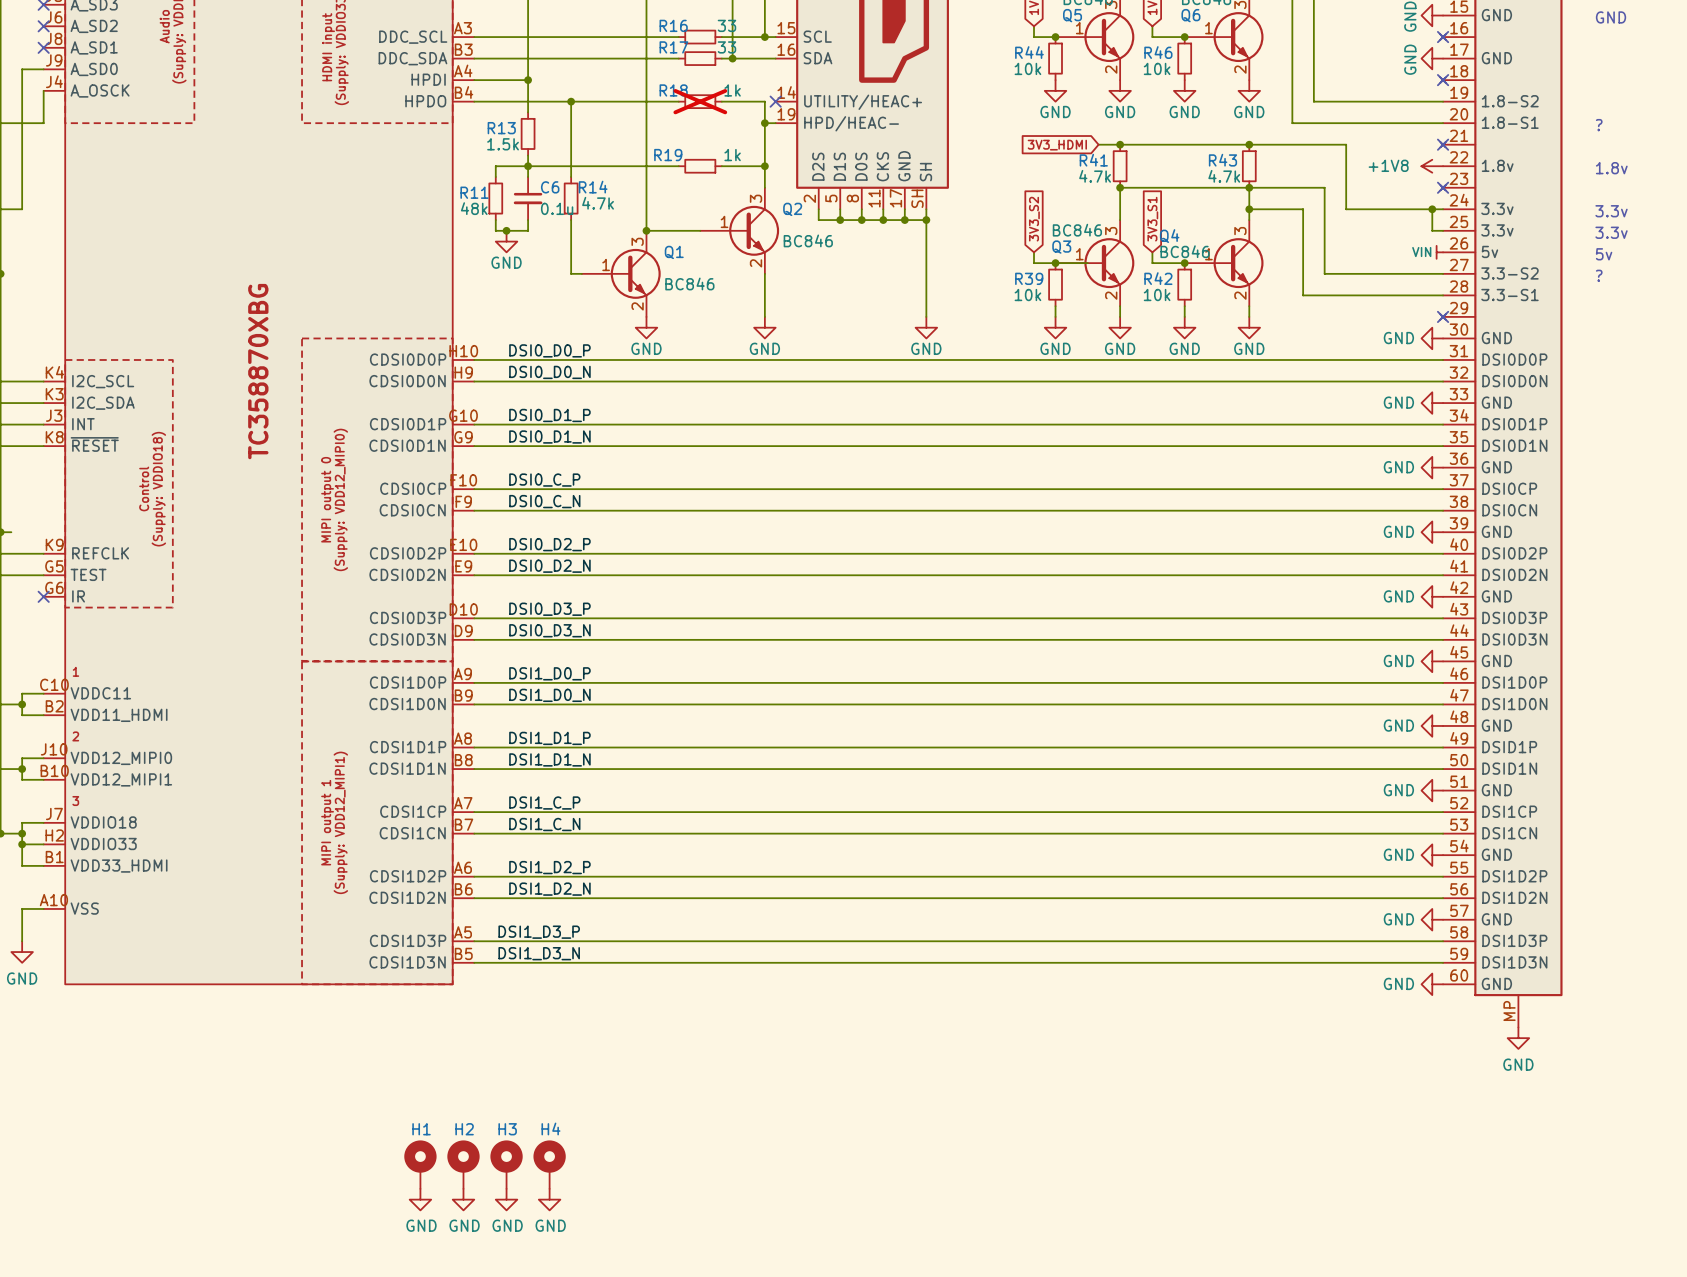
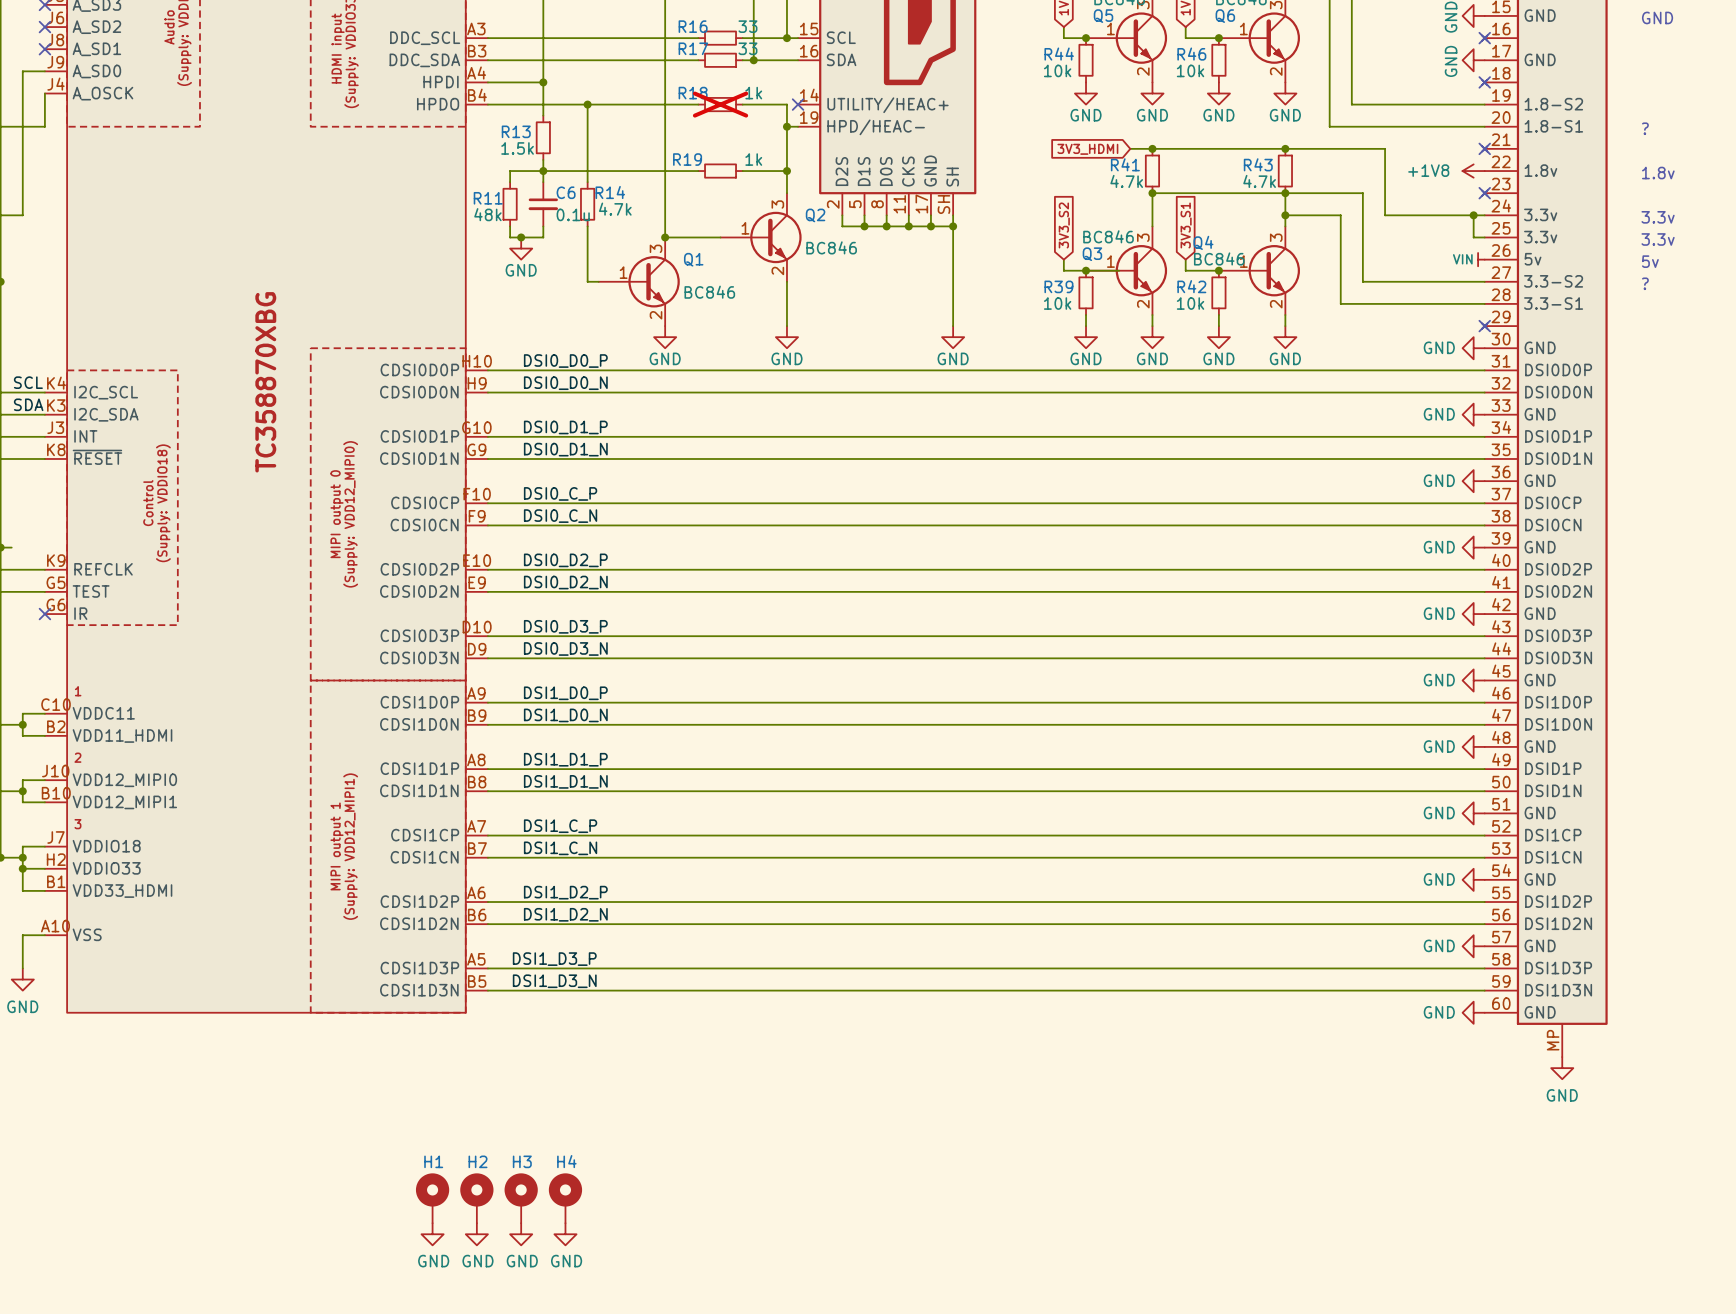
label: none -> SCL (28, 382)
label: none -> SDA (28, 404)

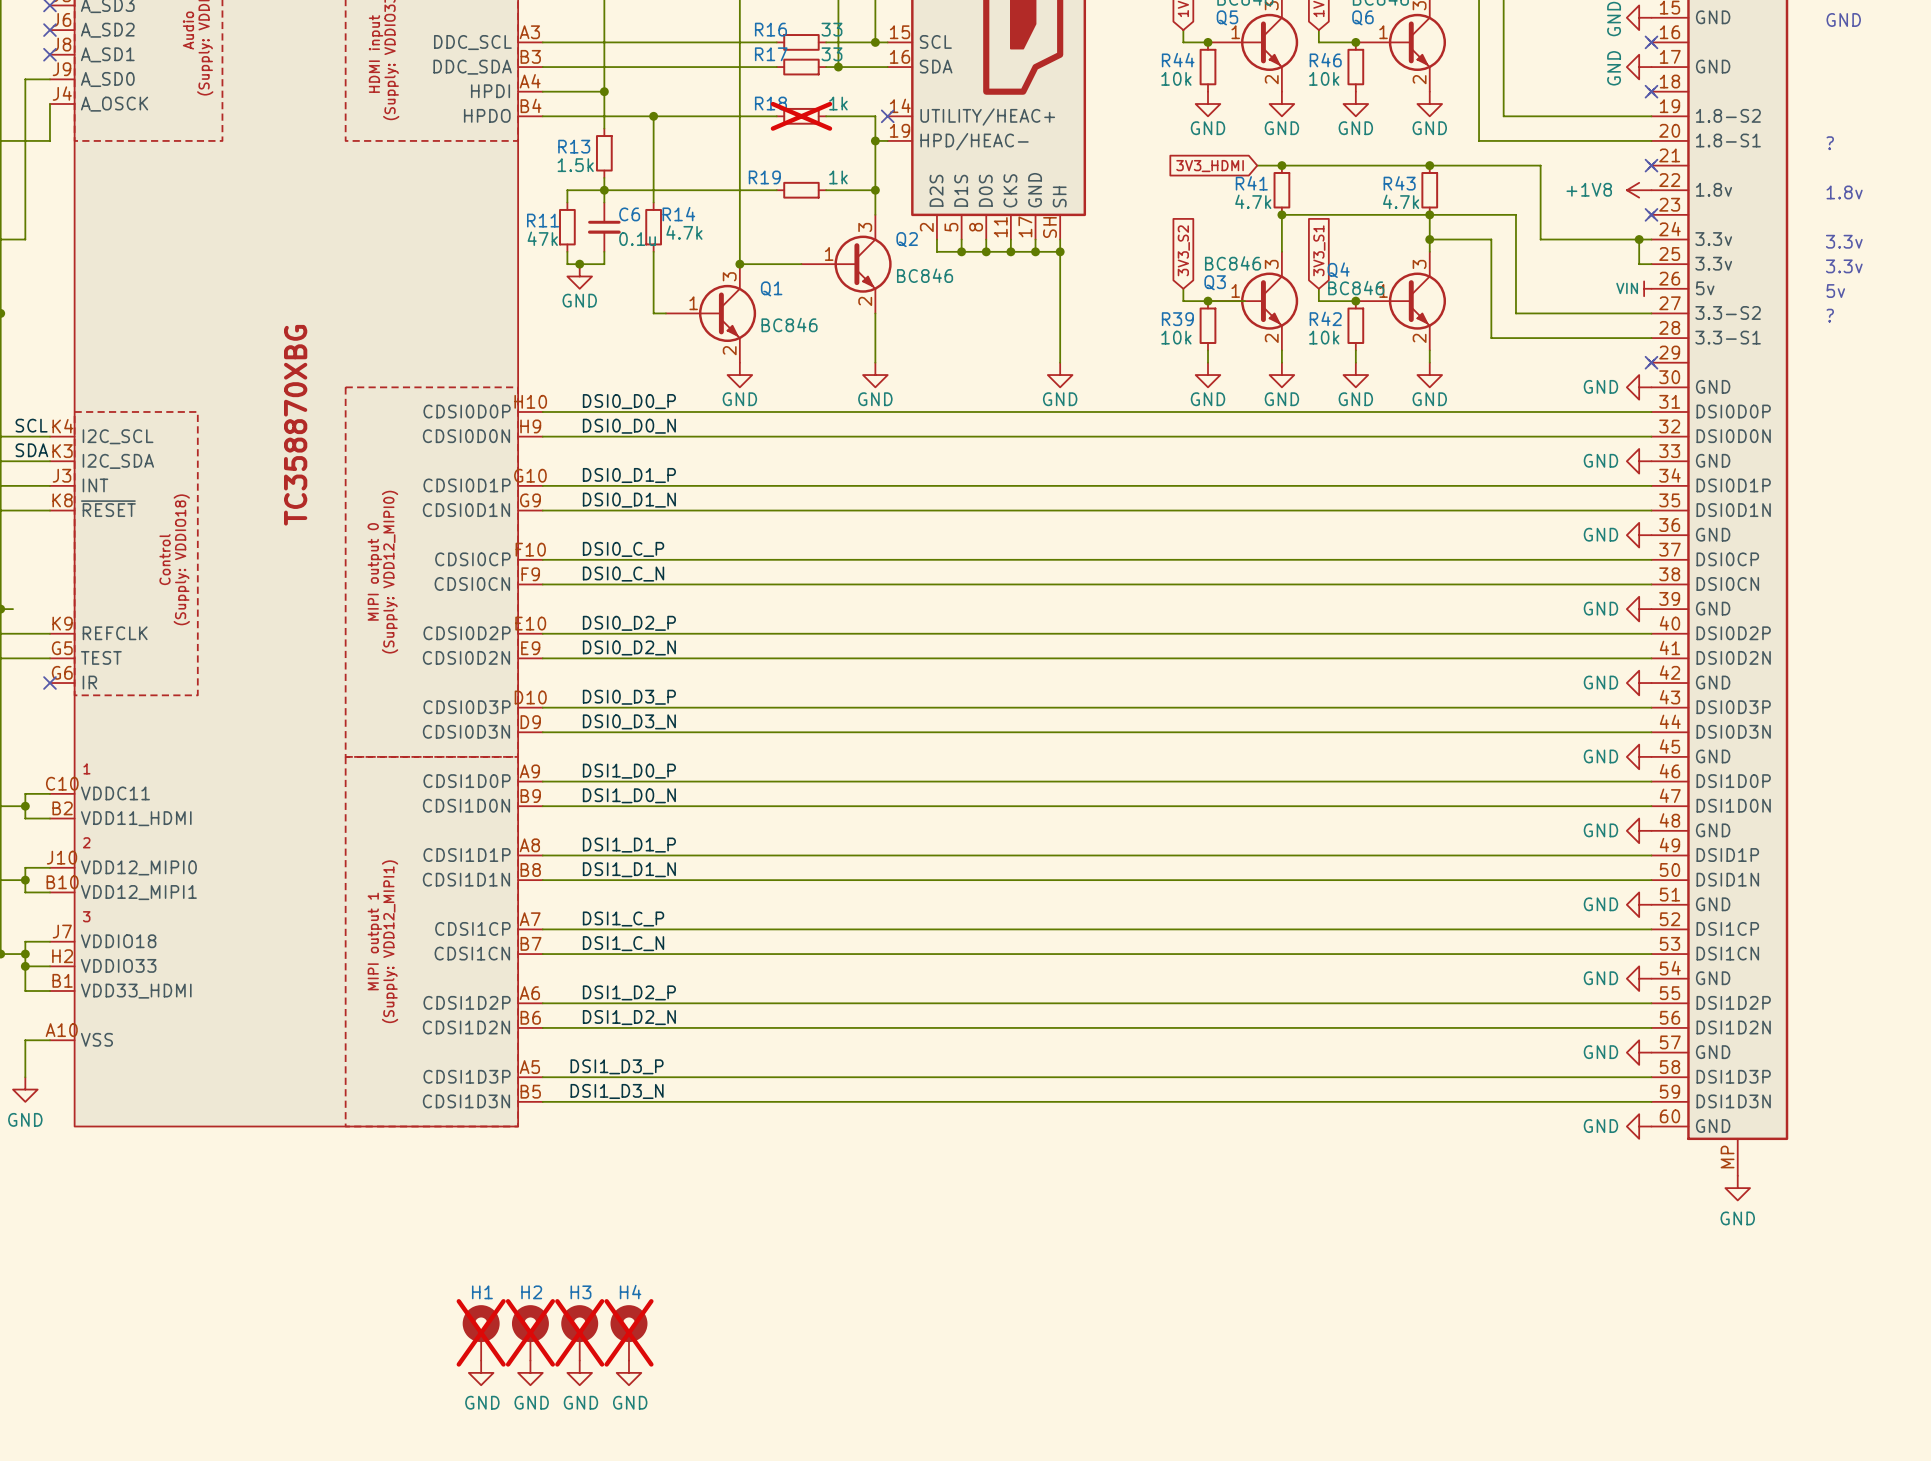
R11 value: 48k (487, 214) -> 47k (542, 238)
H1 do-not-place cross: none -> (481, 1332)
H2 do-not-place cross: none -> (530, 1332)
H3 do-not-place cross: none -> (579, 1332)
H4 do-not-place cross: none -> (628, 1332)

